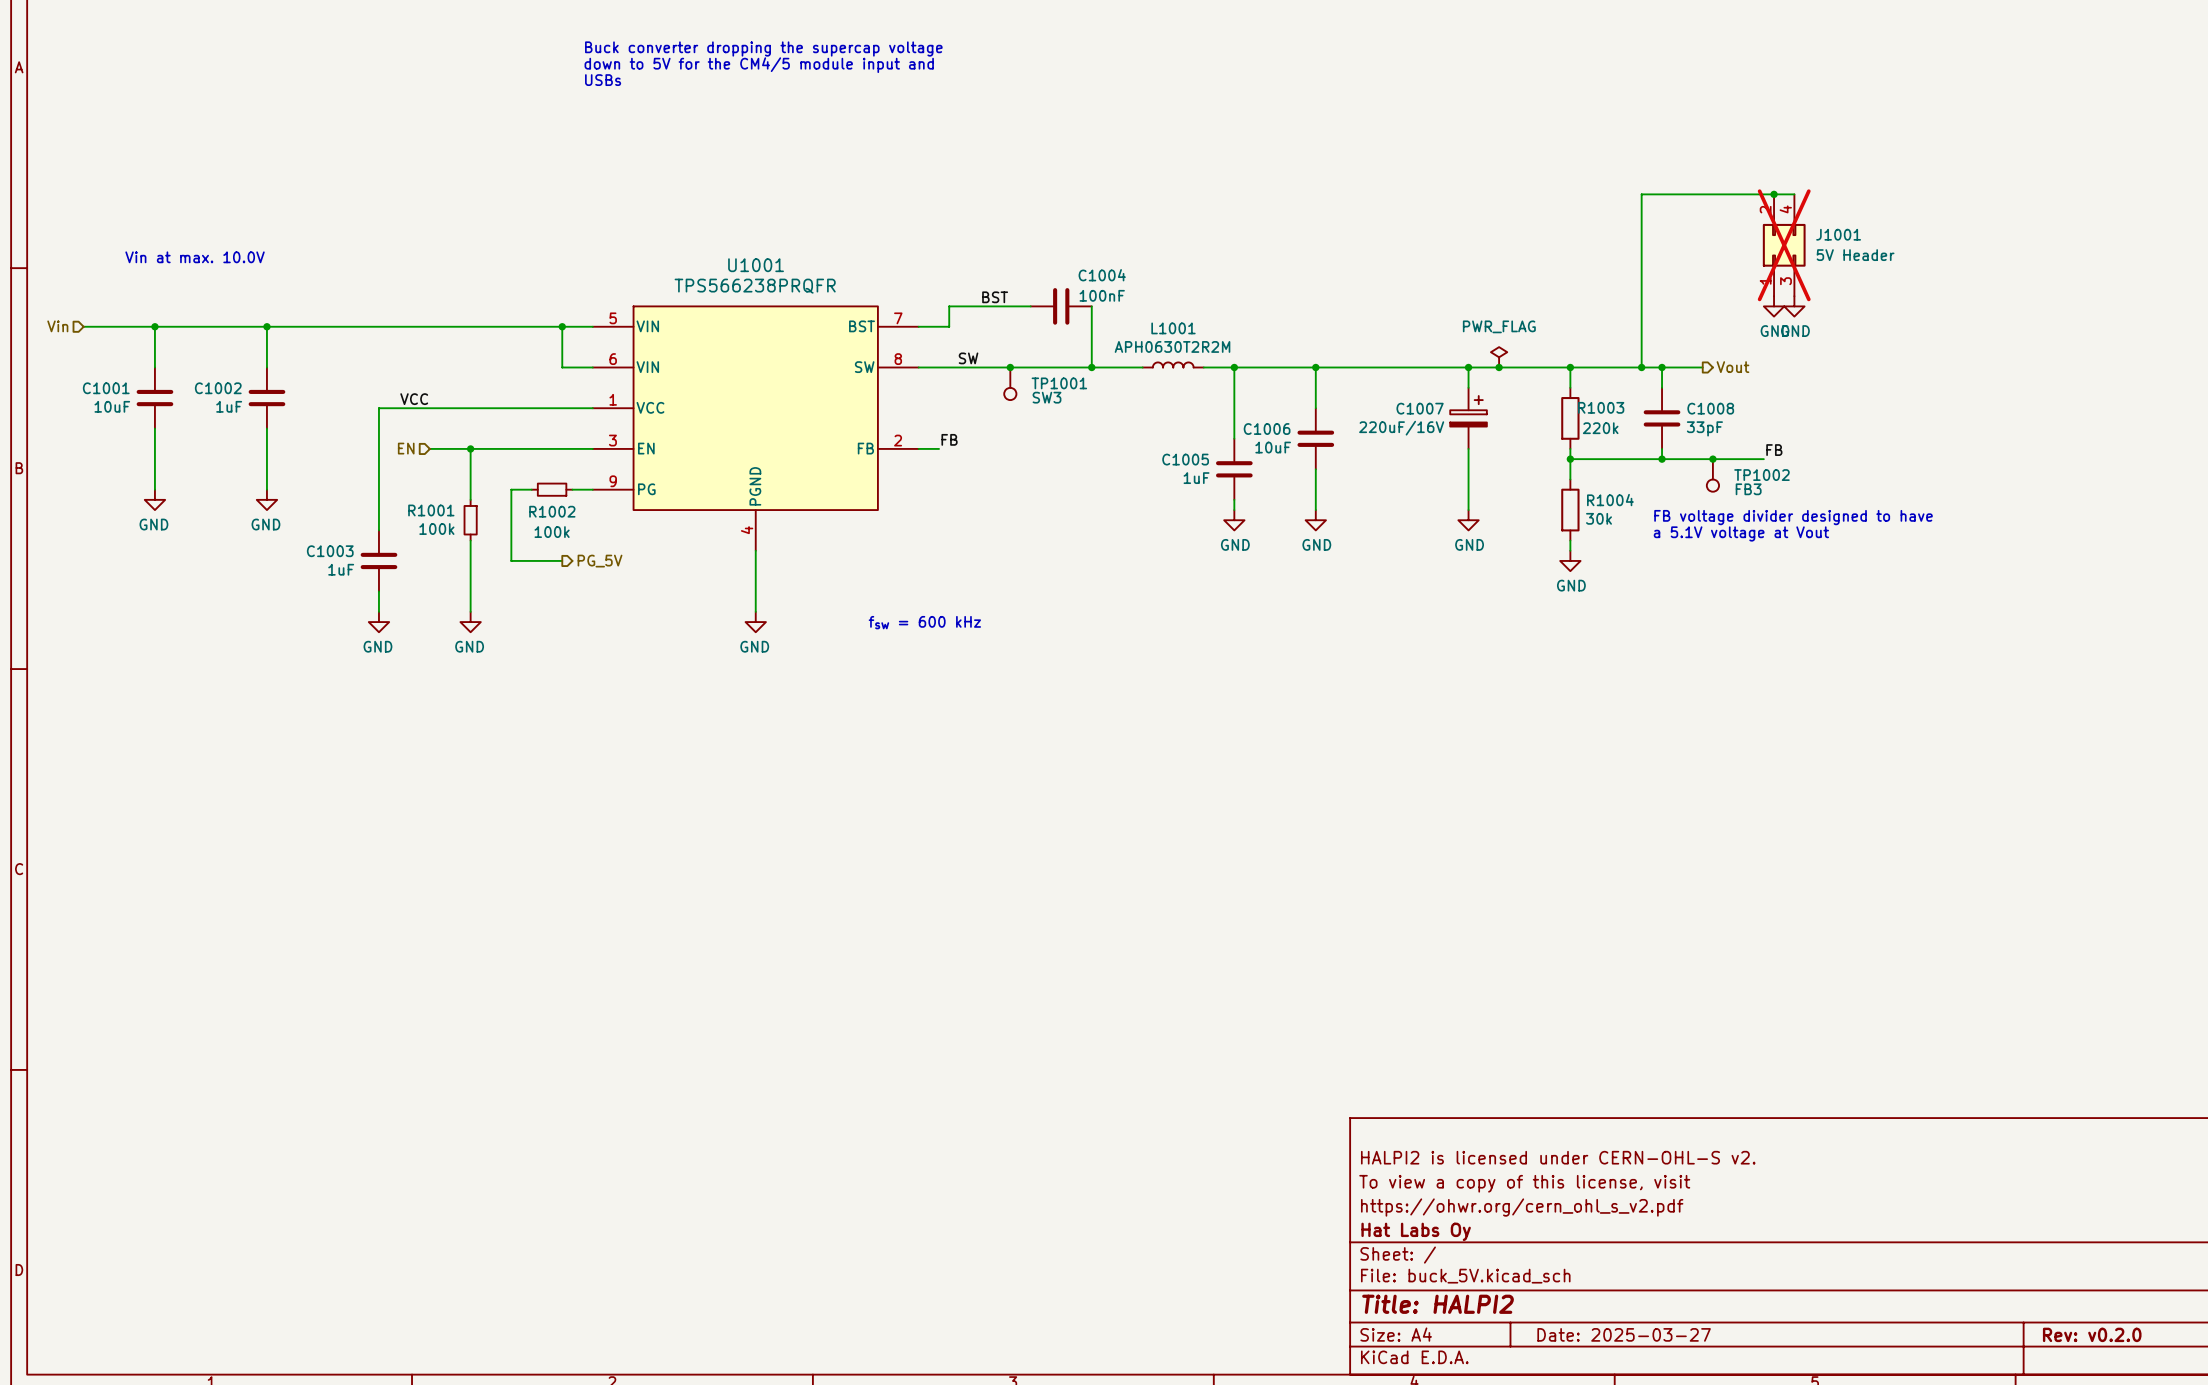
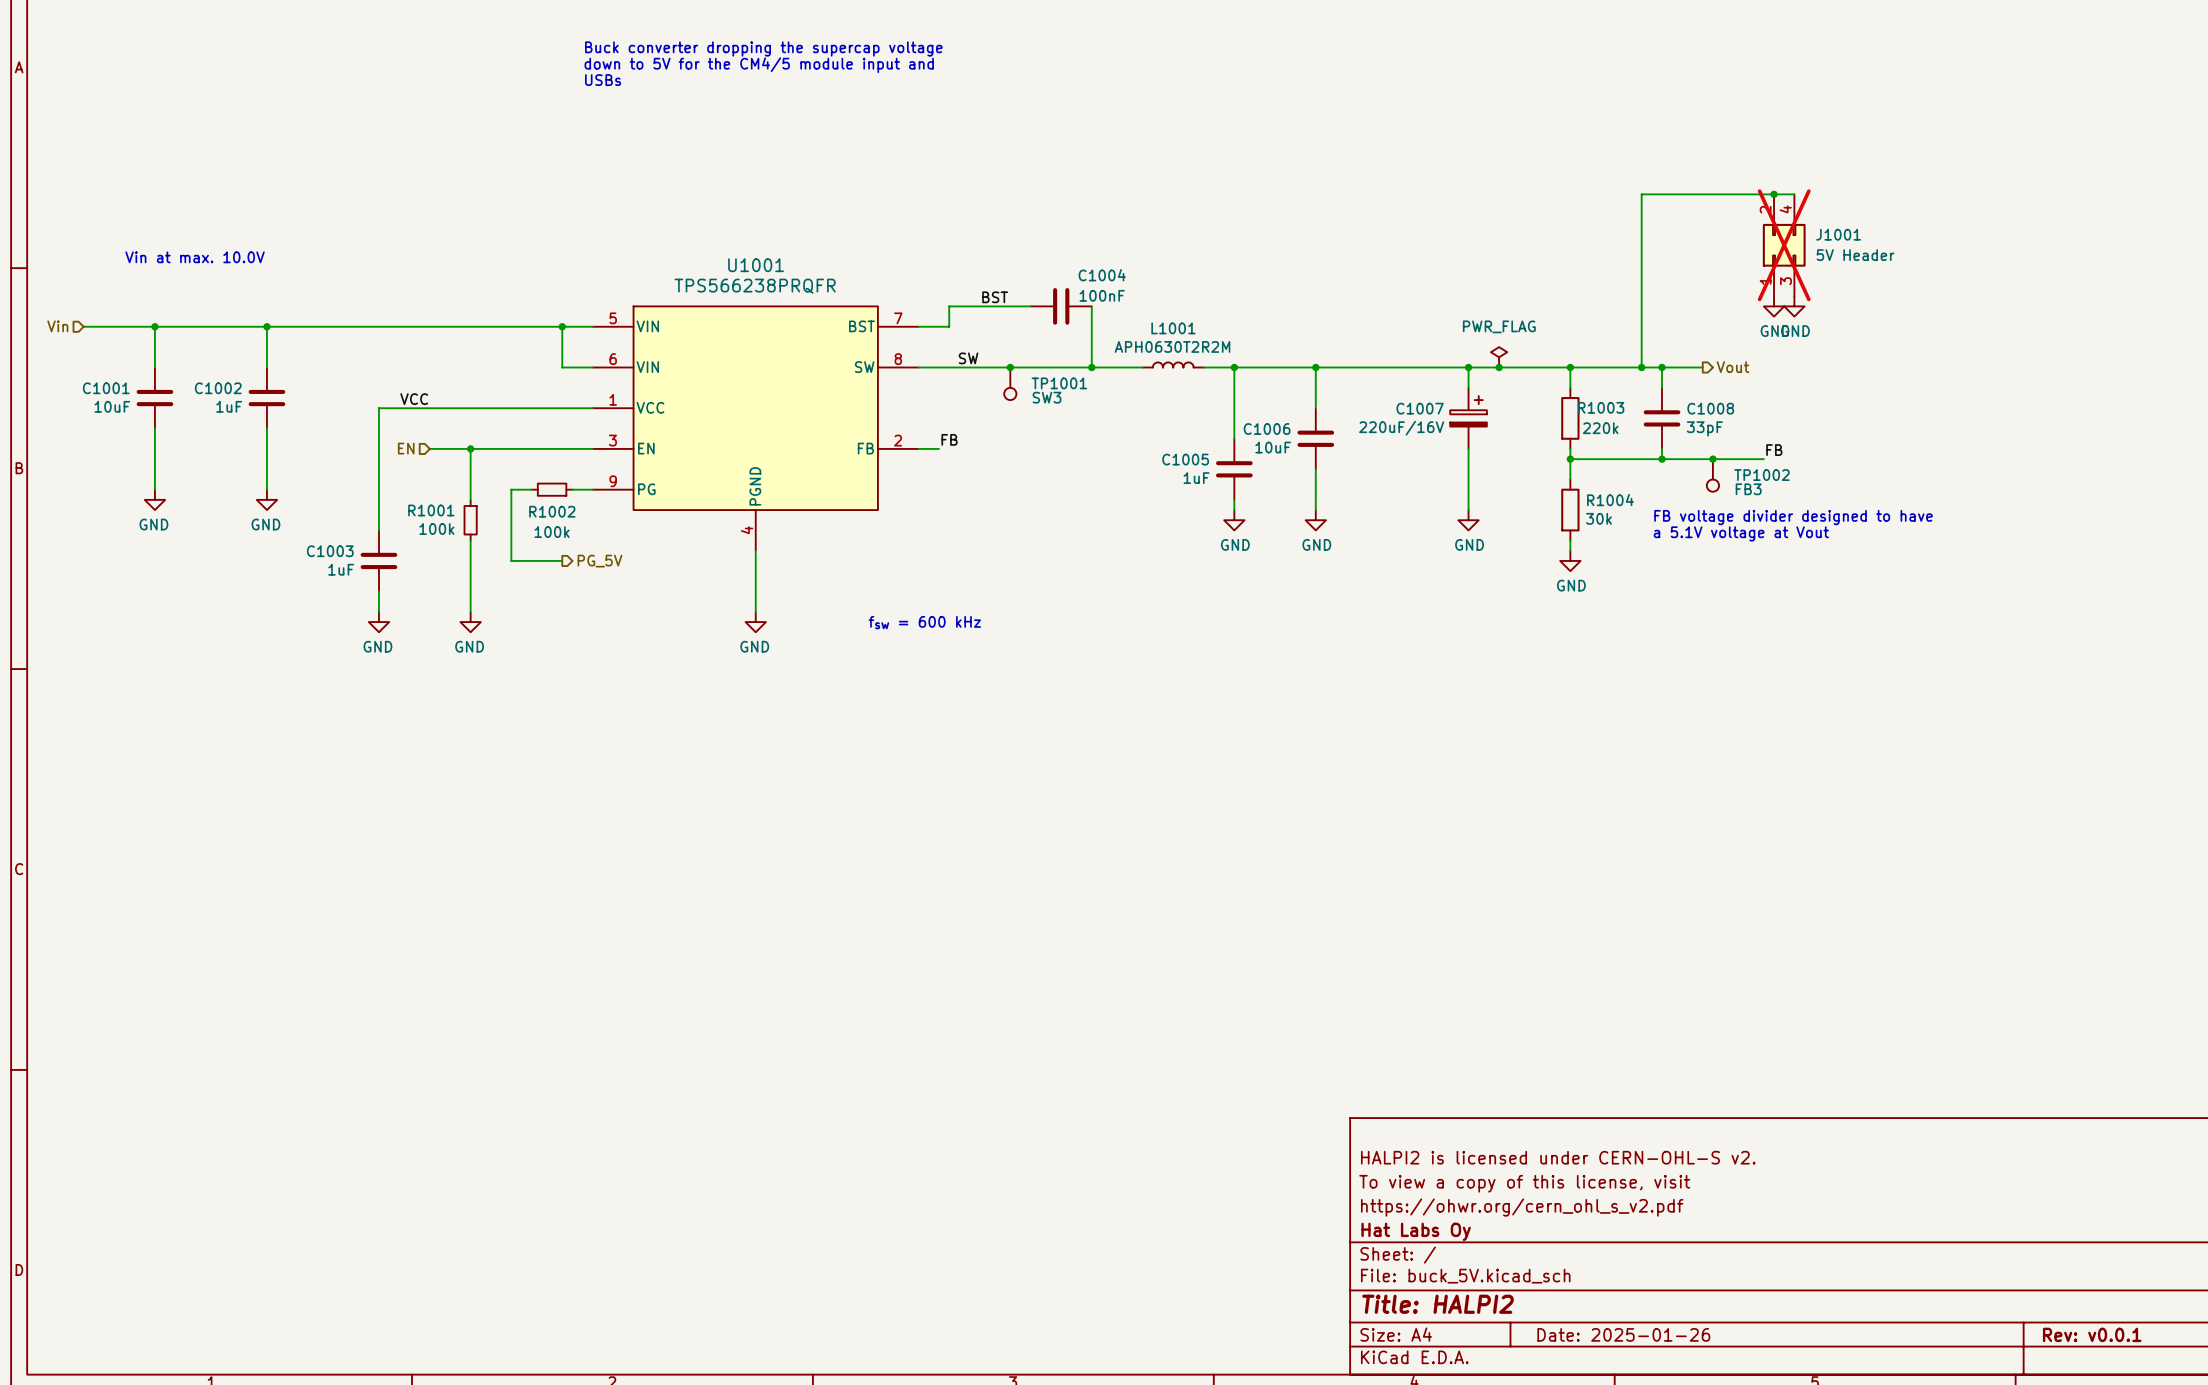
title block: Date: 2025-03-27 (1624, 1334) -> Date: 2025-01-26 (1623, 1334)
title block: Rev: v0.2.0 (2092, 1334) -> Rev: v0.0.1 (2092, 1334)

